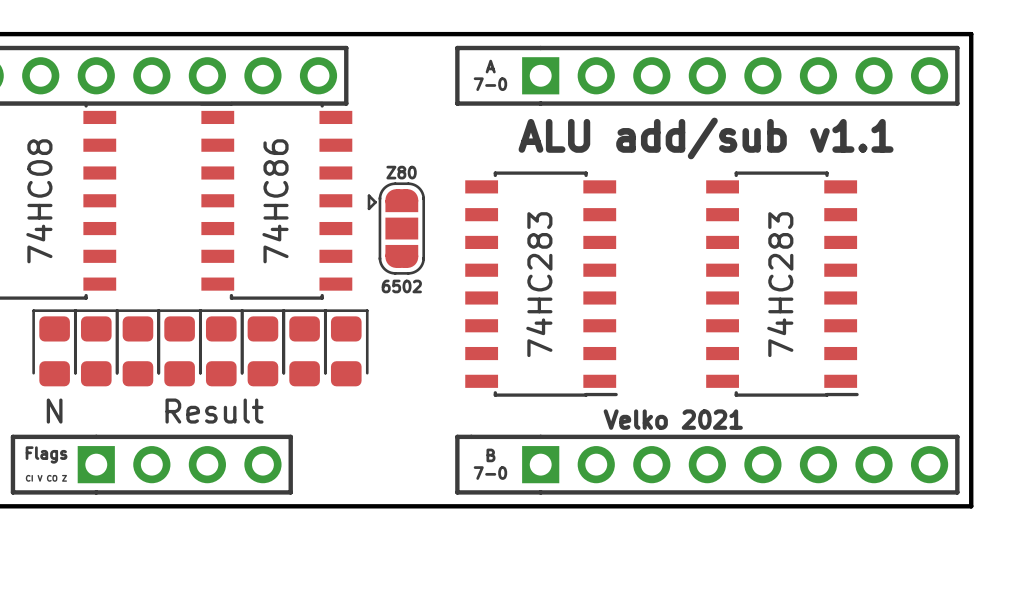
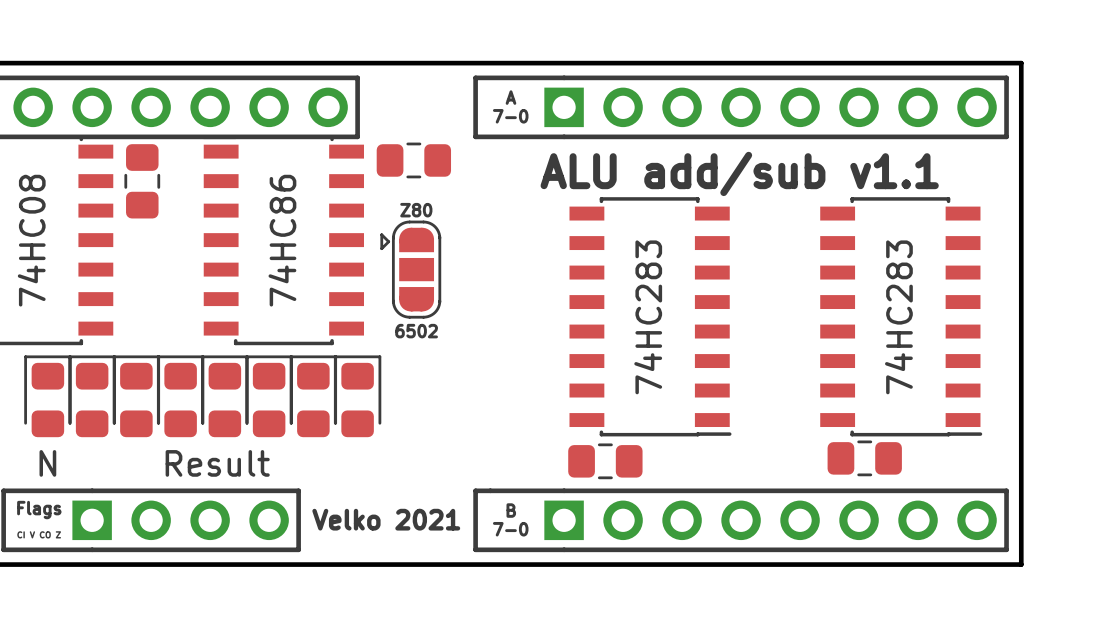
part: none -> (413, 160)
part: none -> (142, 181)
part: none -> 74HC283 (650, 316)
part: 74HC283 (541, 284) -> none
part position: (782, 284) -> (901, 316)
part: none -> (864, 458)
part: none -> (605, 461)
text position: Velko 2021 (673, 419) -> Velko 2021 (386, 519)

